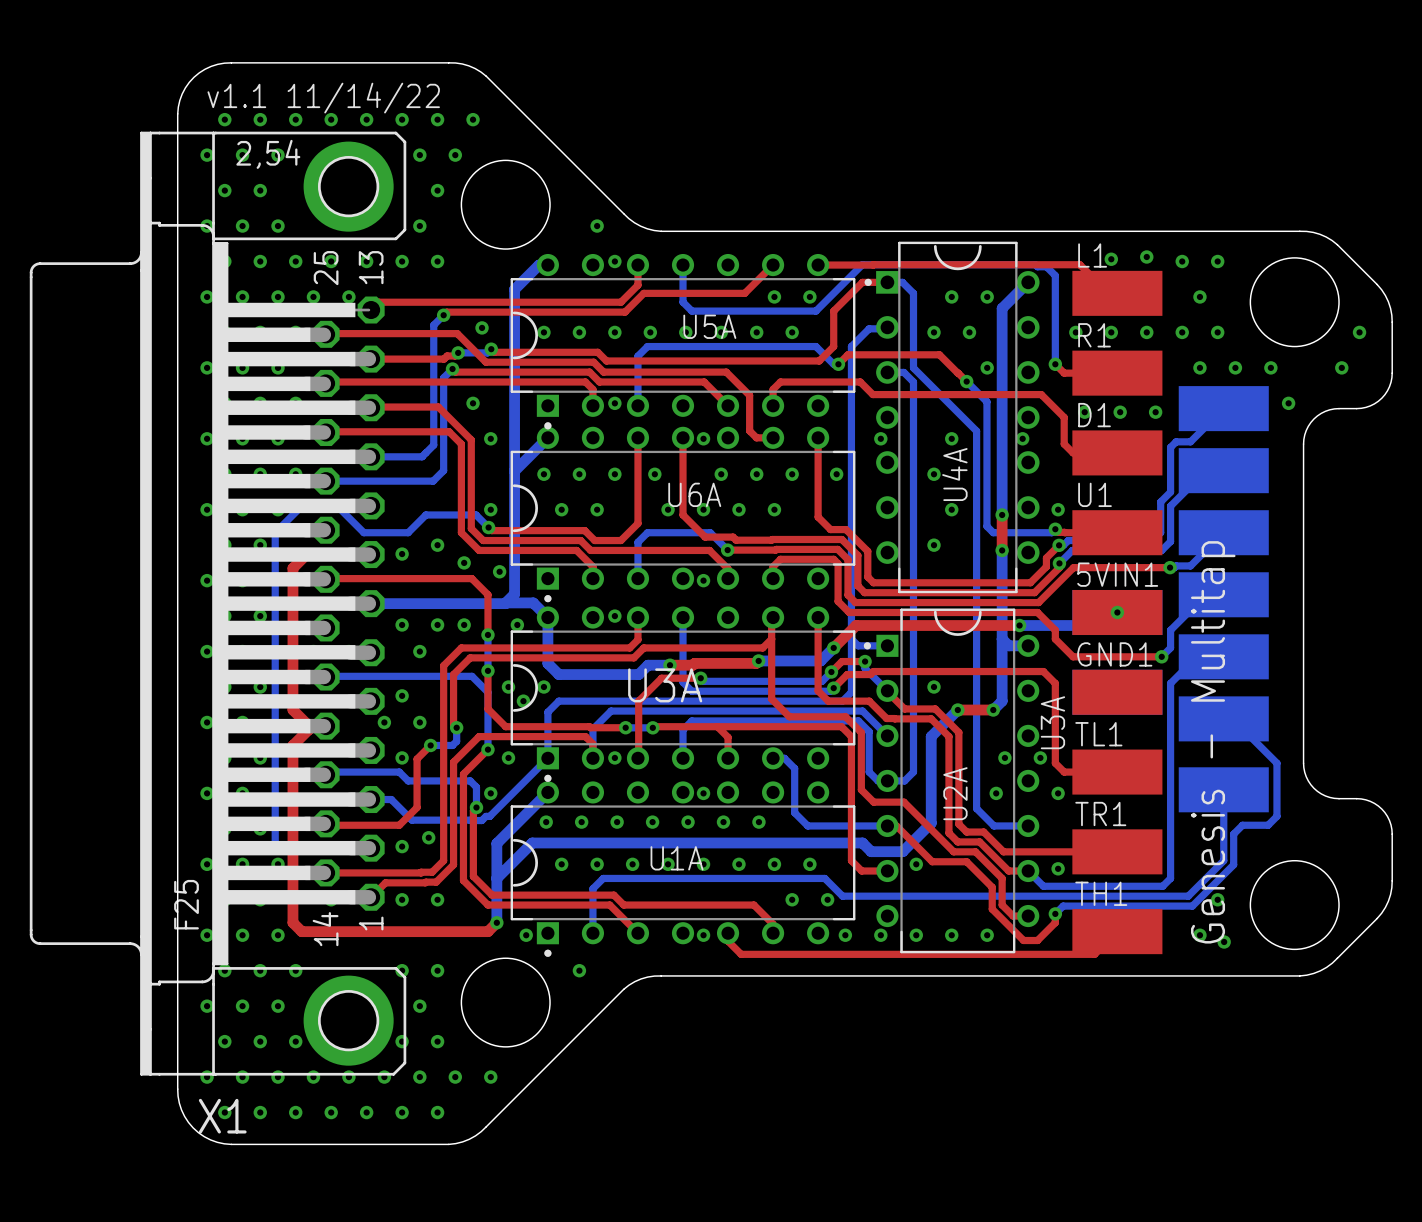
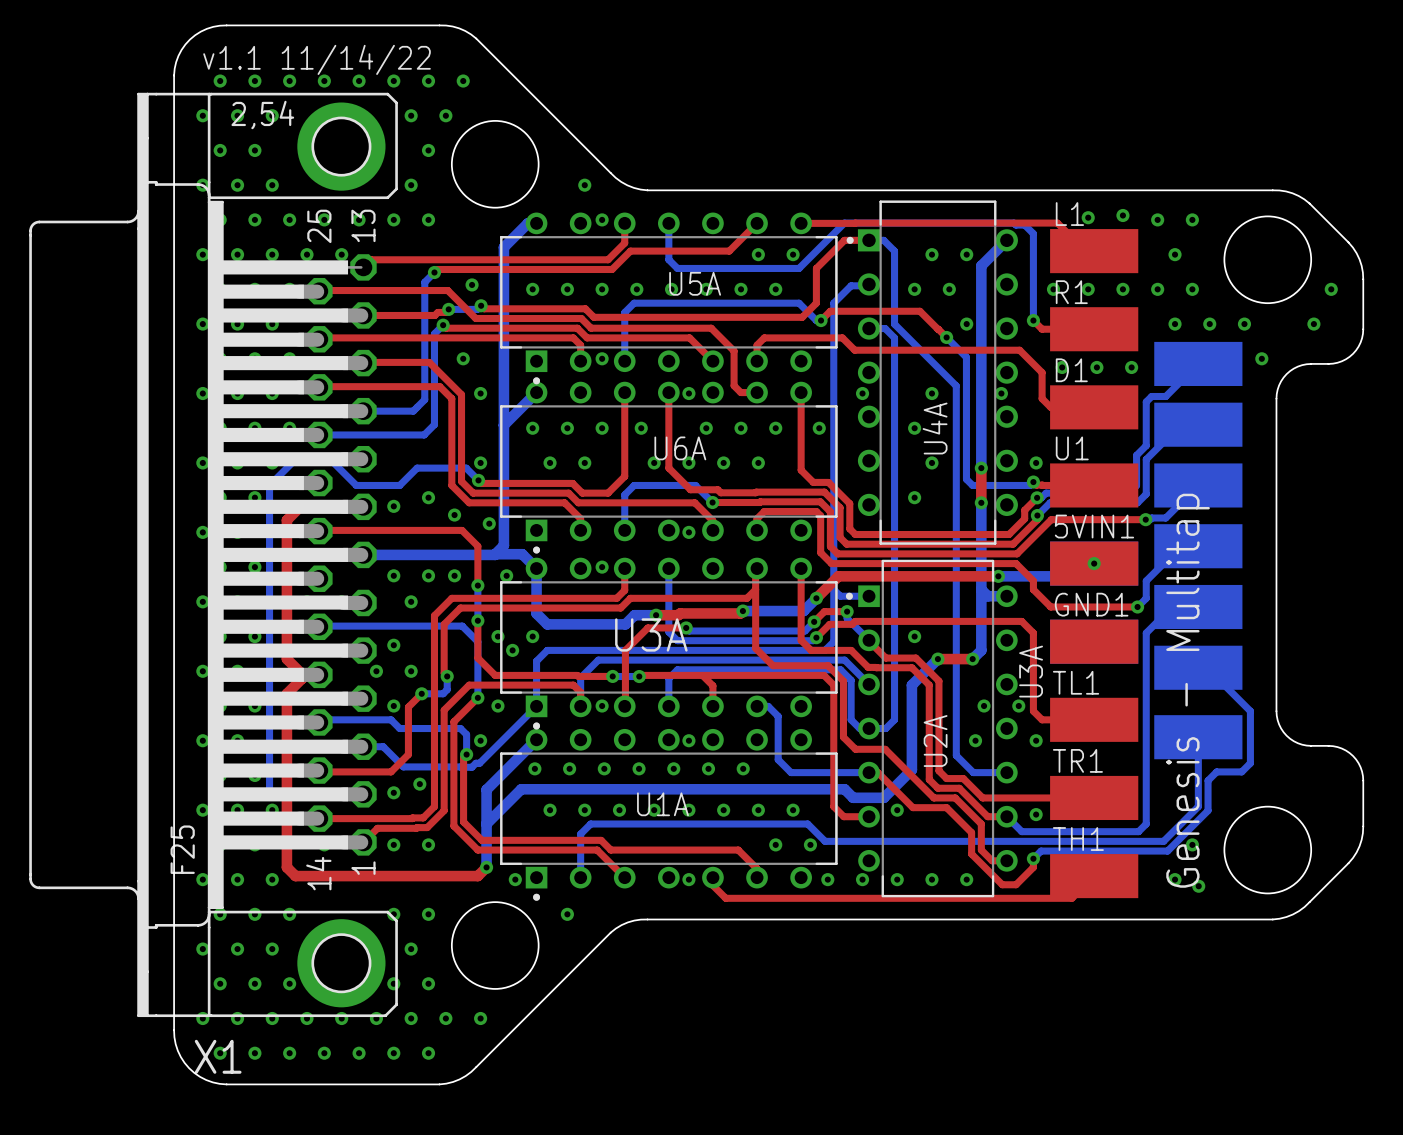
U4A footprint: [864, 241, 1040, 594] -> [846, 200, 1018, 545]
U5A footprint: [510, 253, 856, 430] -> [500, 212, 838, 385]
U6A footprint: [510, 426, 856, 603] -> [500, 381, 838, 554]
U3A footprint: [510, 606, 856, 782] -> [500, 557, 838, 730]
U2A footprint: [863, 608, 1040, 954] -> [845, 559, 1018, 898]
U1A footprint: [510, 781, 856, 957] -> [500, 728, 838, 901]

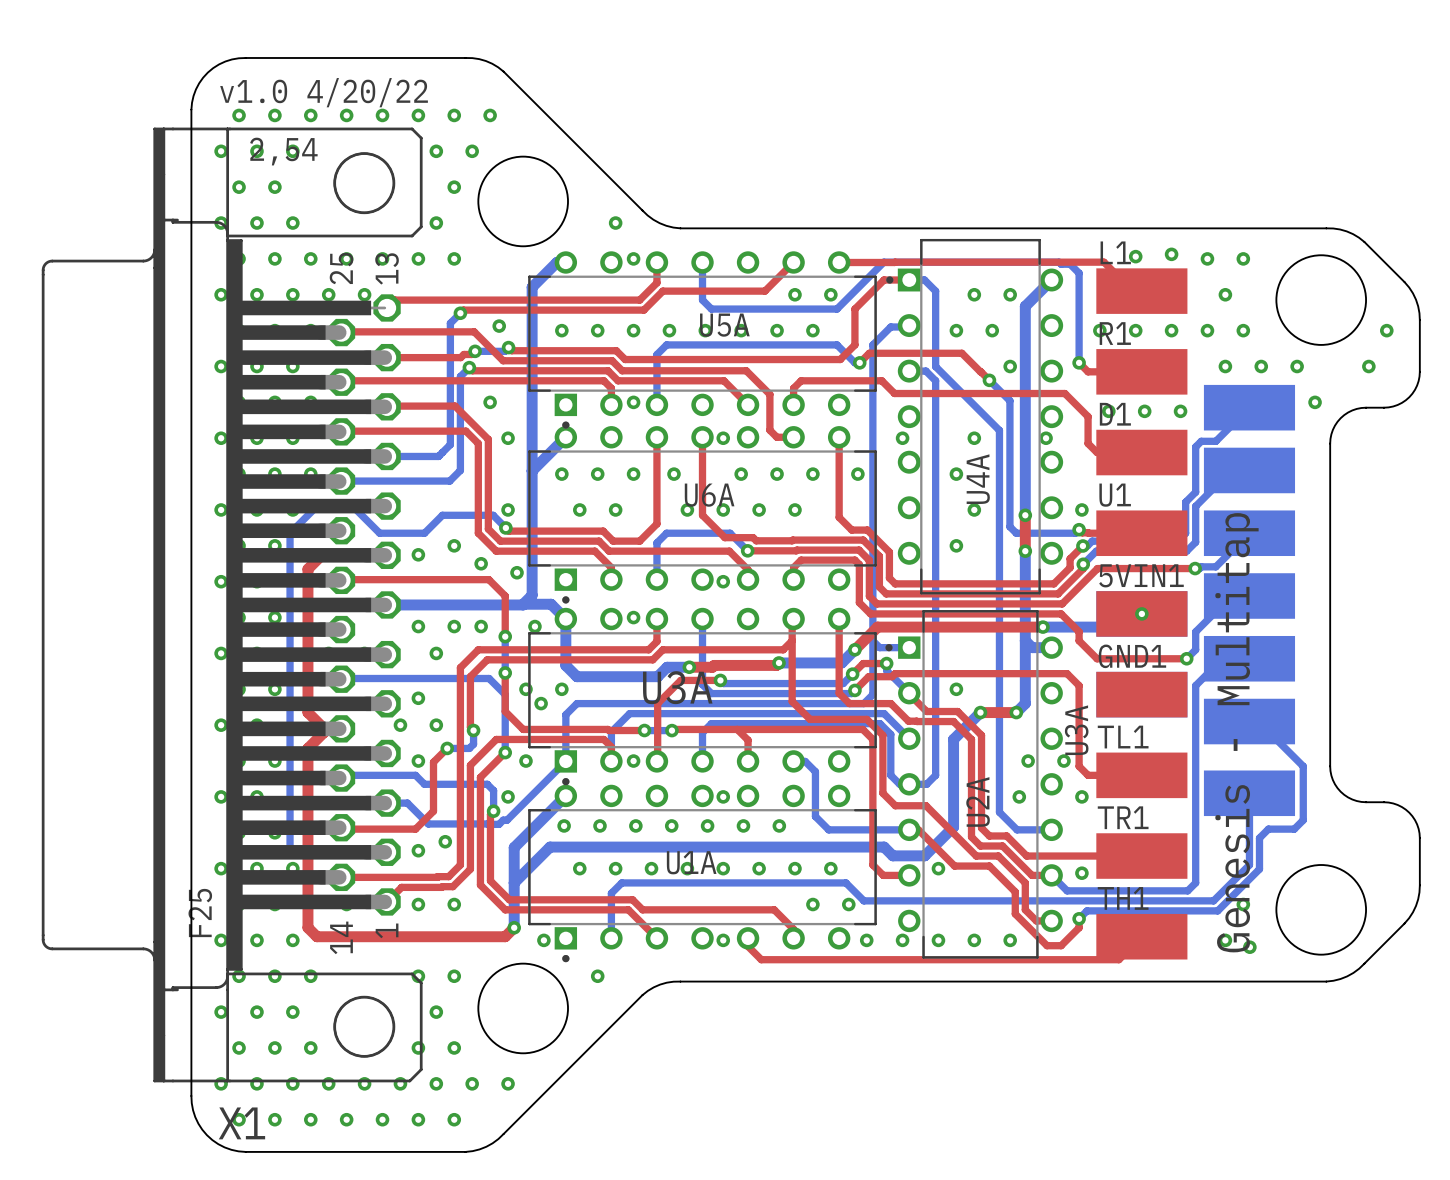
text: v1.1 11/14/22 (317, 59) -> v1.0 4/20/22 (324, 92)
X1 footprint: [29, 92, 398, 1018] -> [41, 127, 423, 1083]

